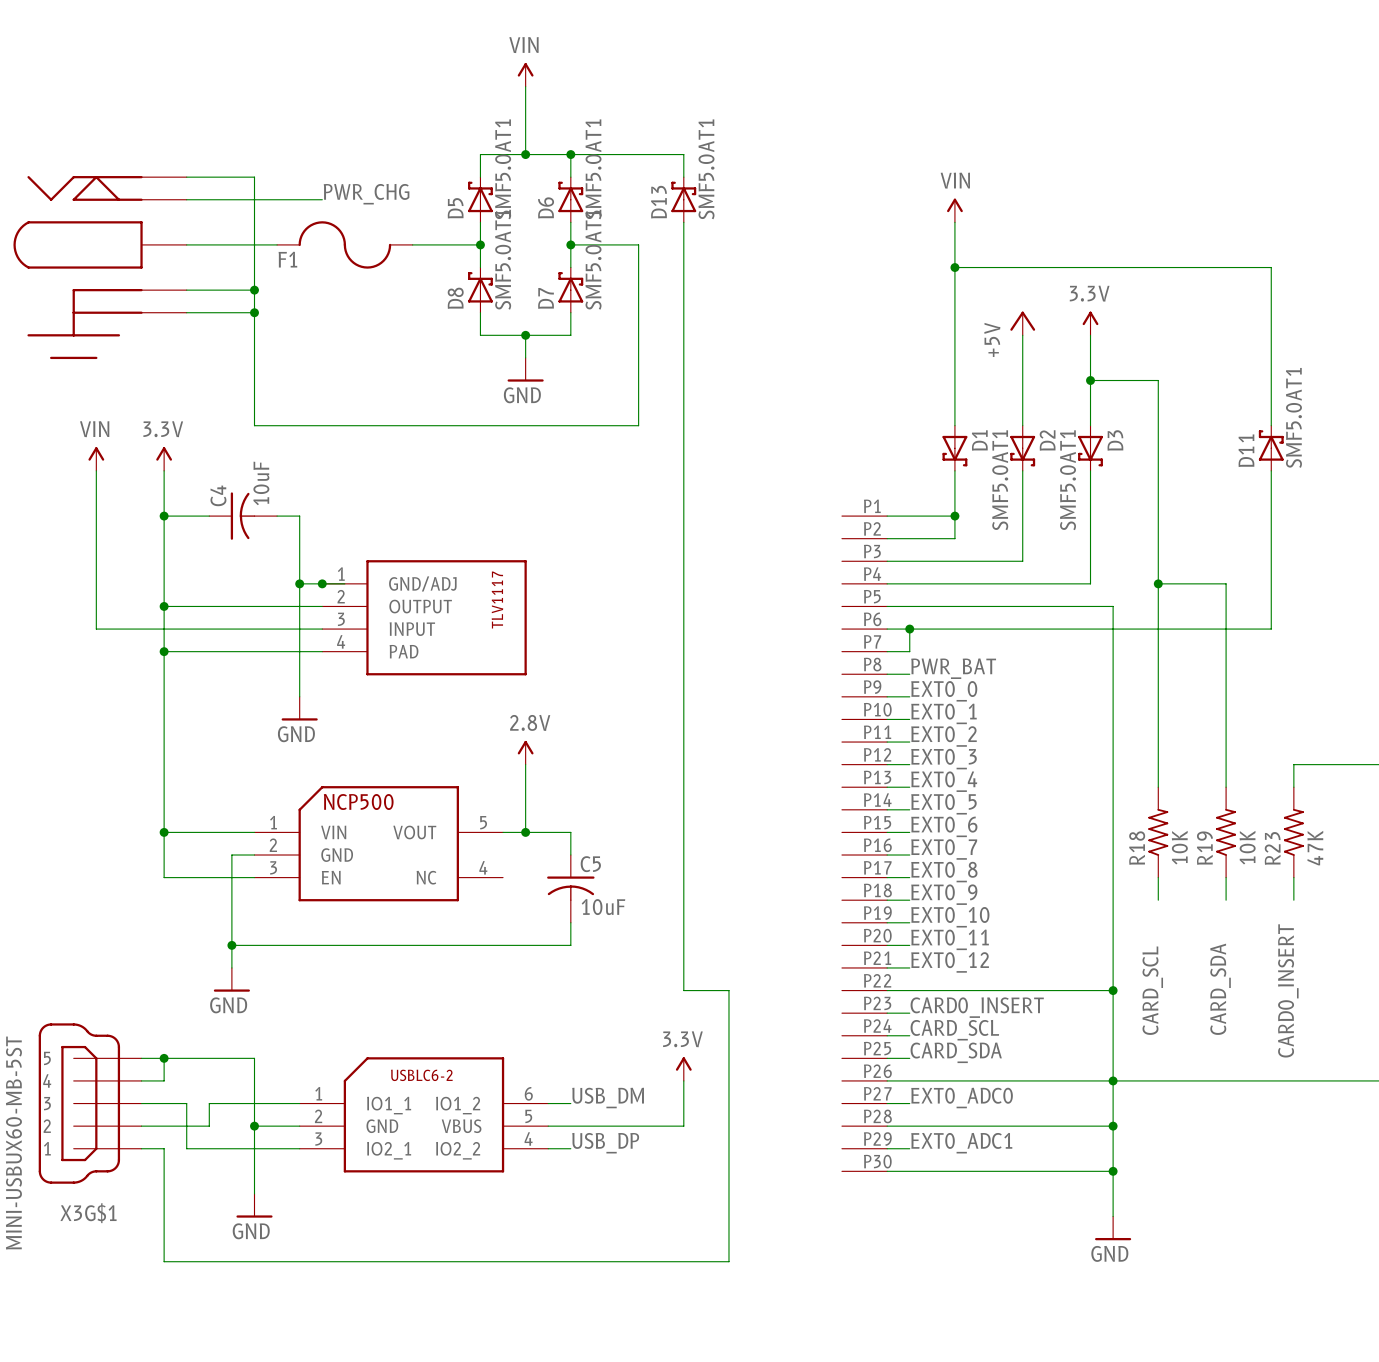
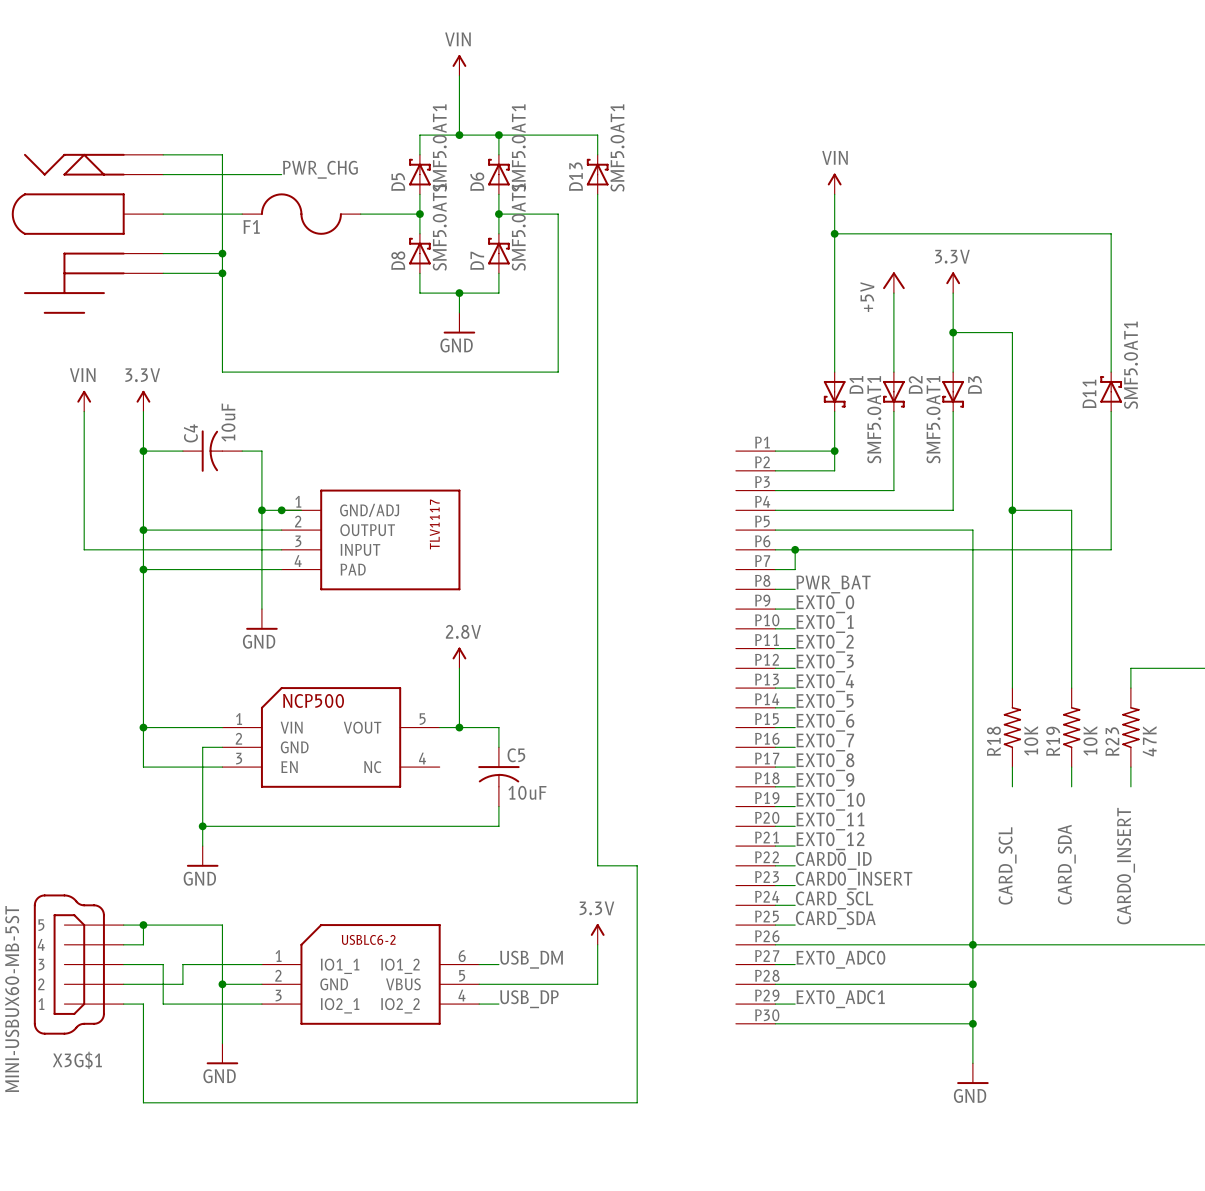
label: none -> CARD0_ID (833, 860)
wire: (909, 990) (1113, 990) -> none
junction: (1113, 990) -> none

